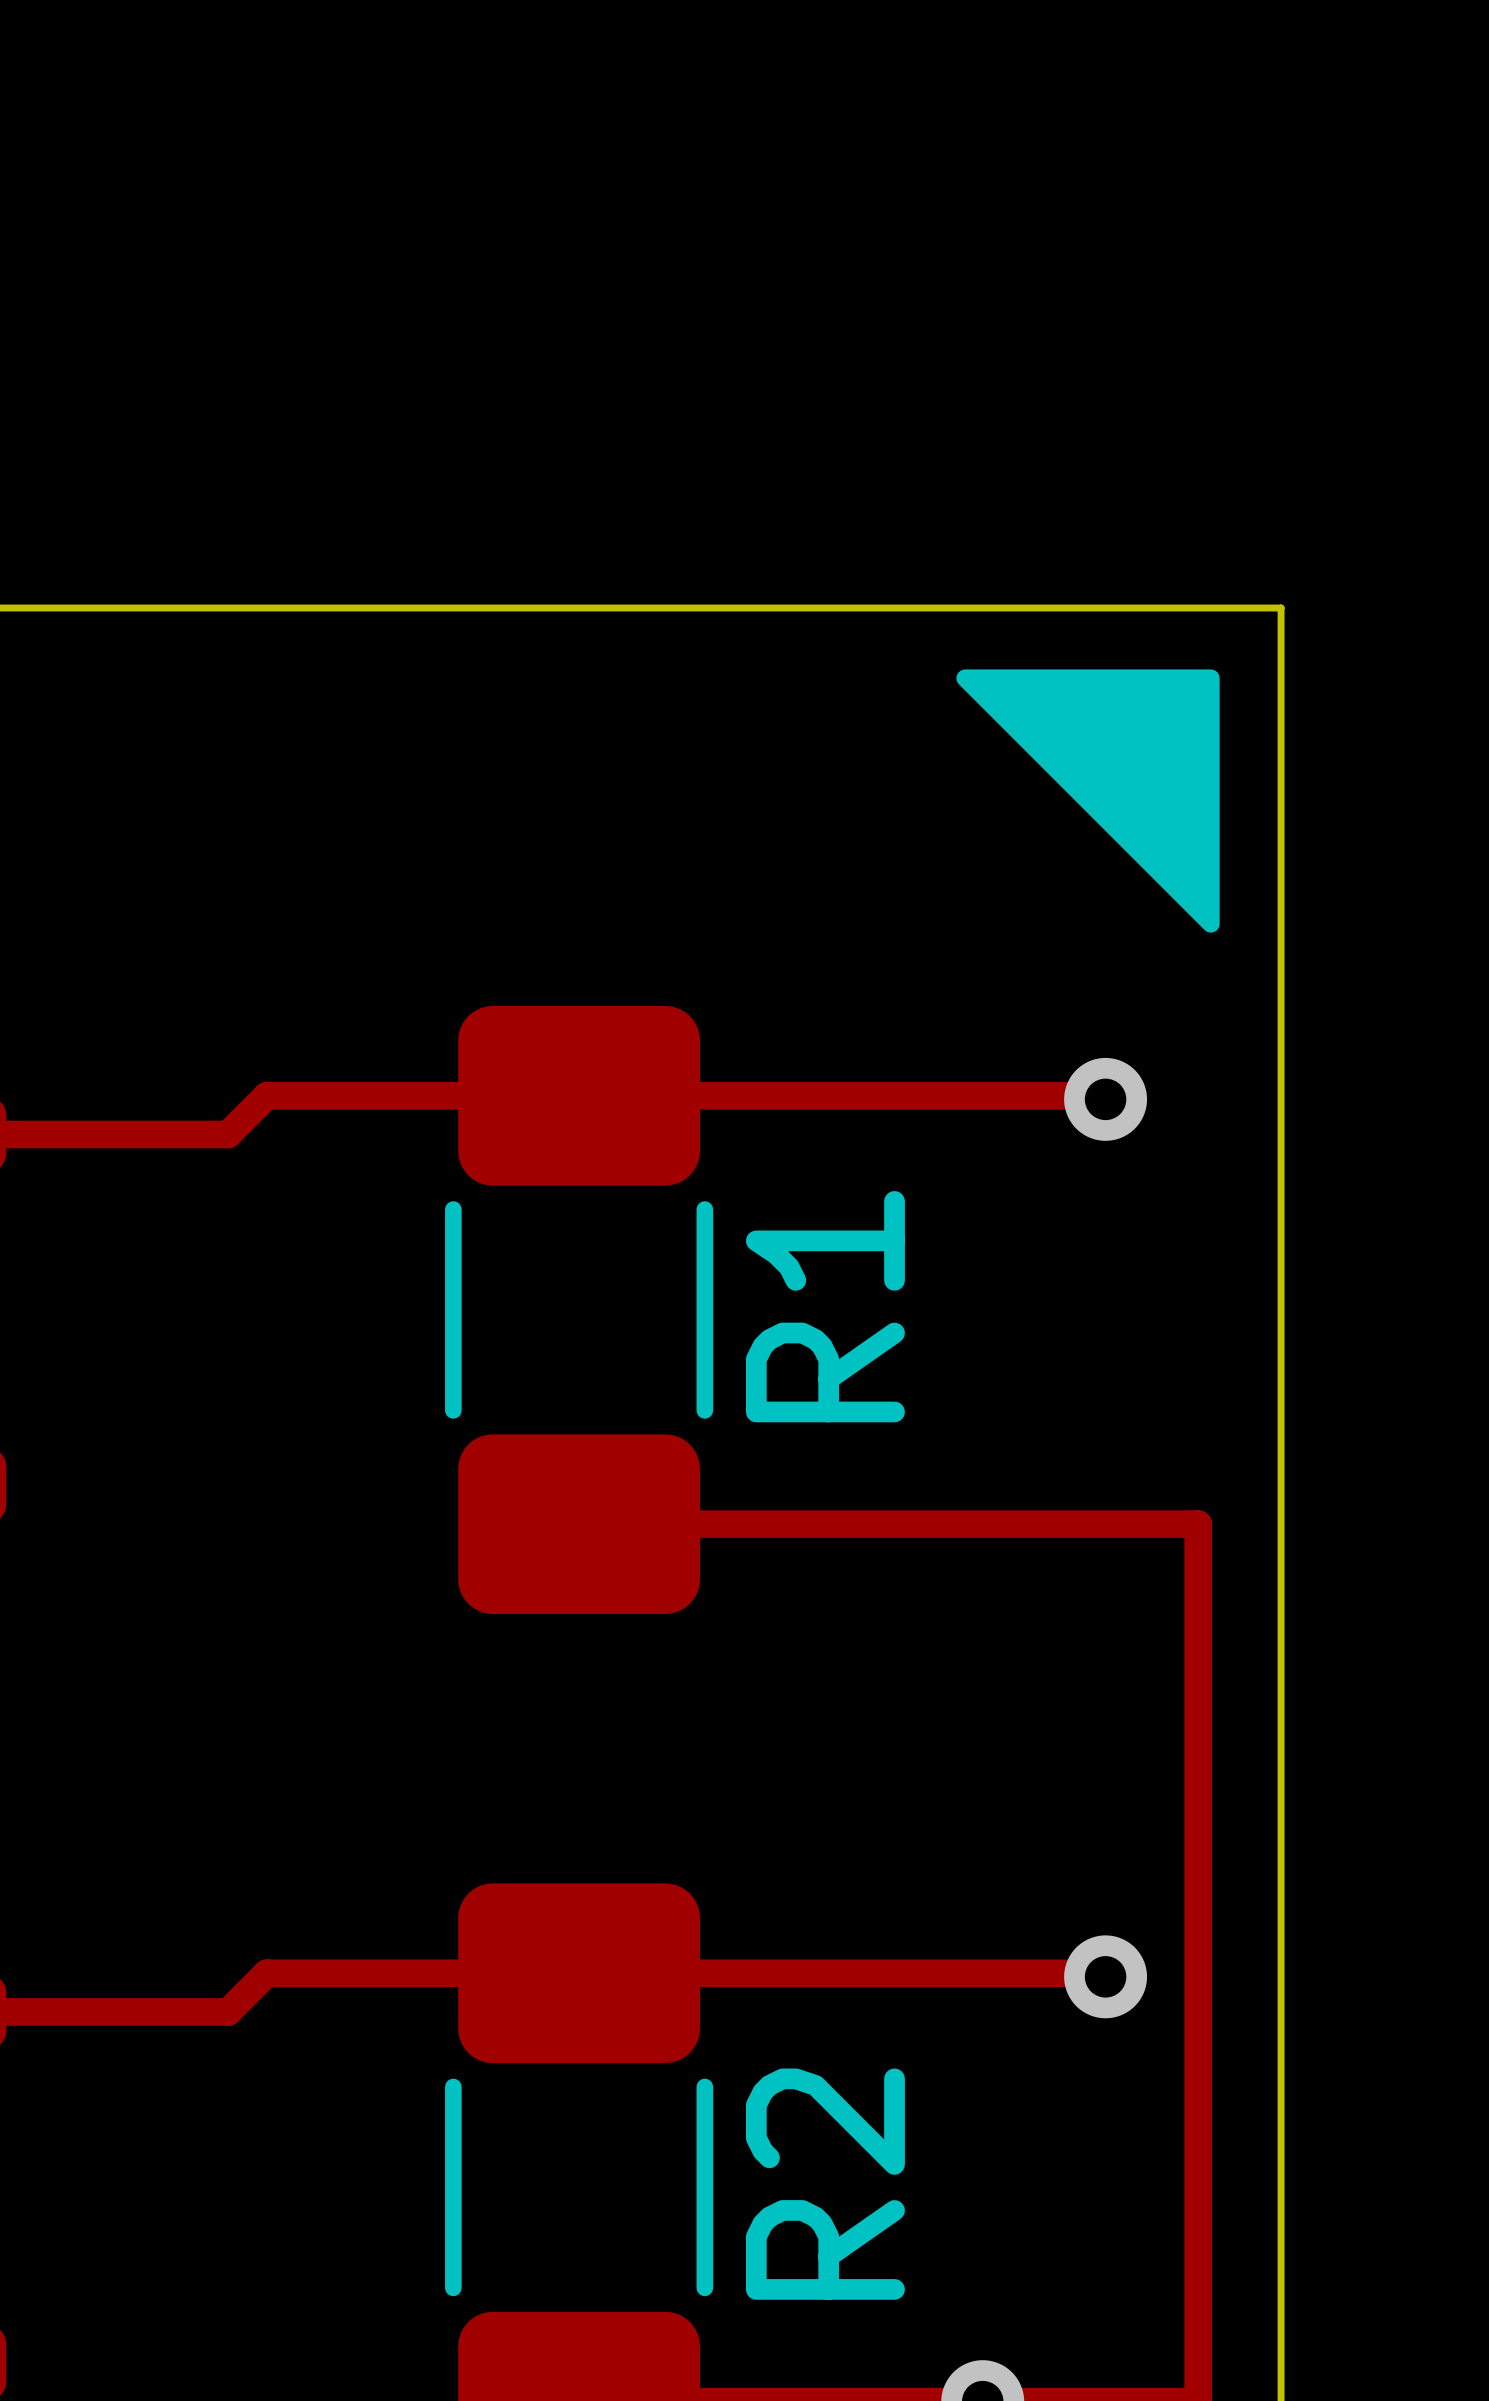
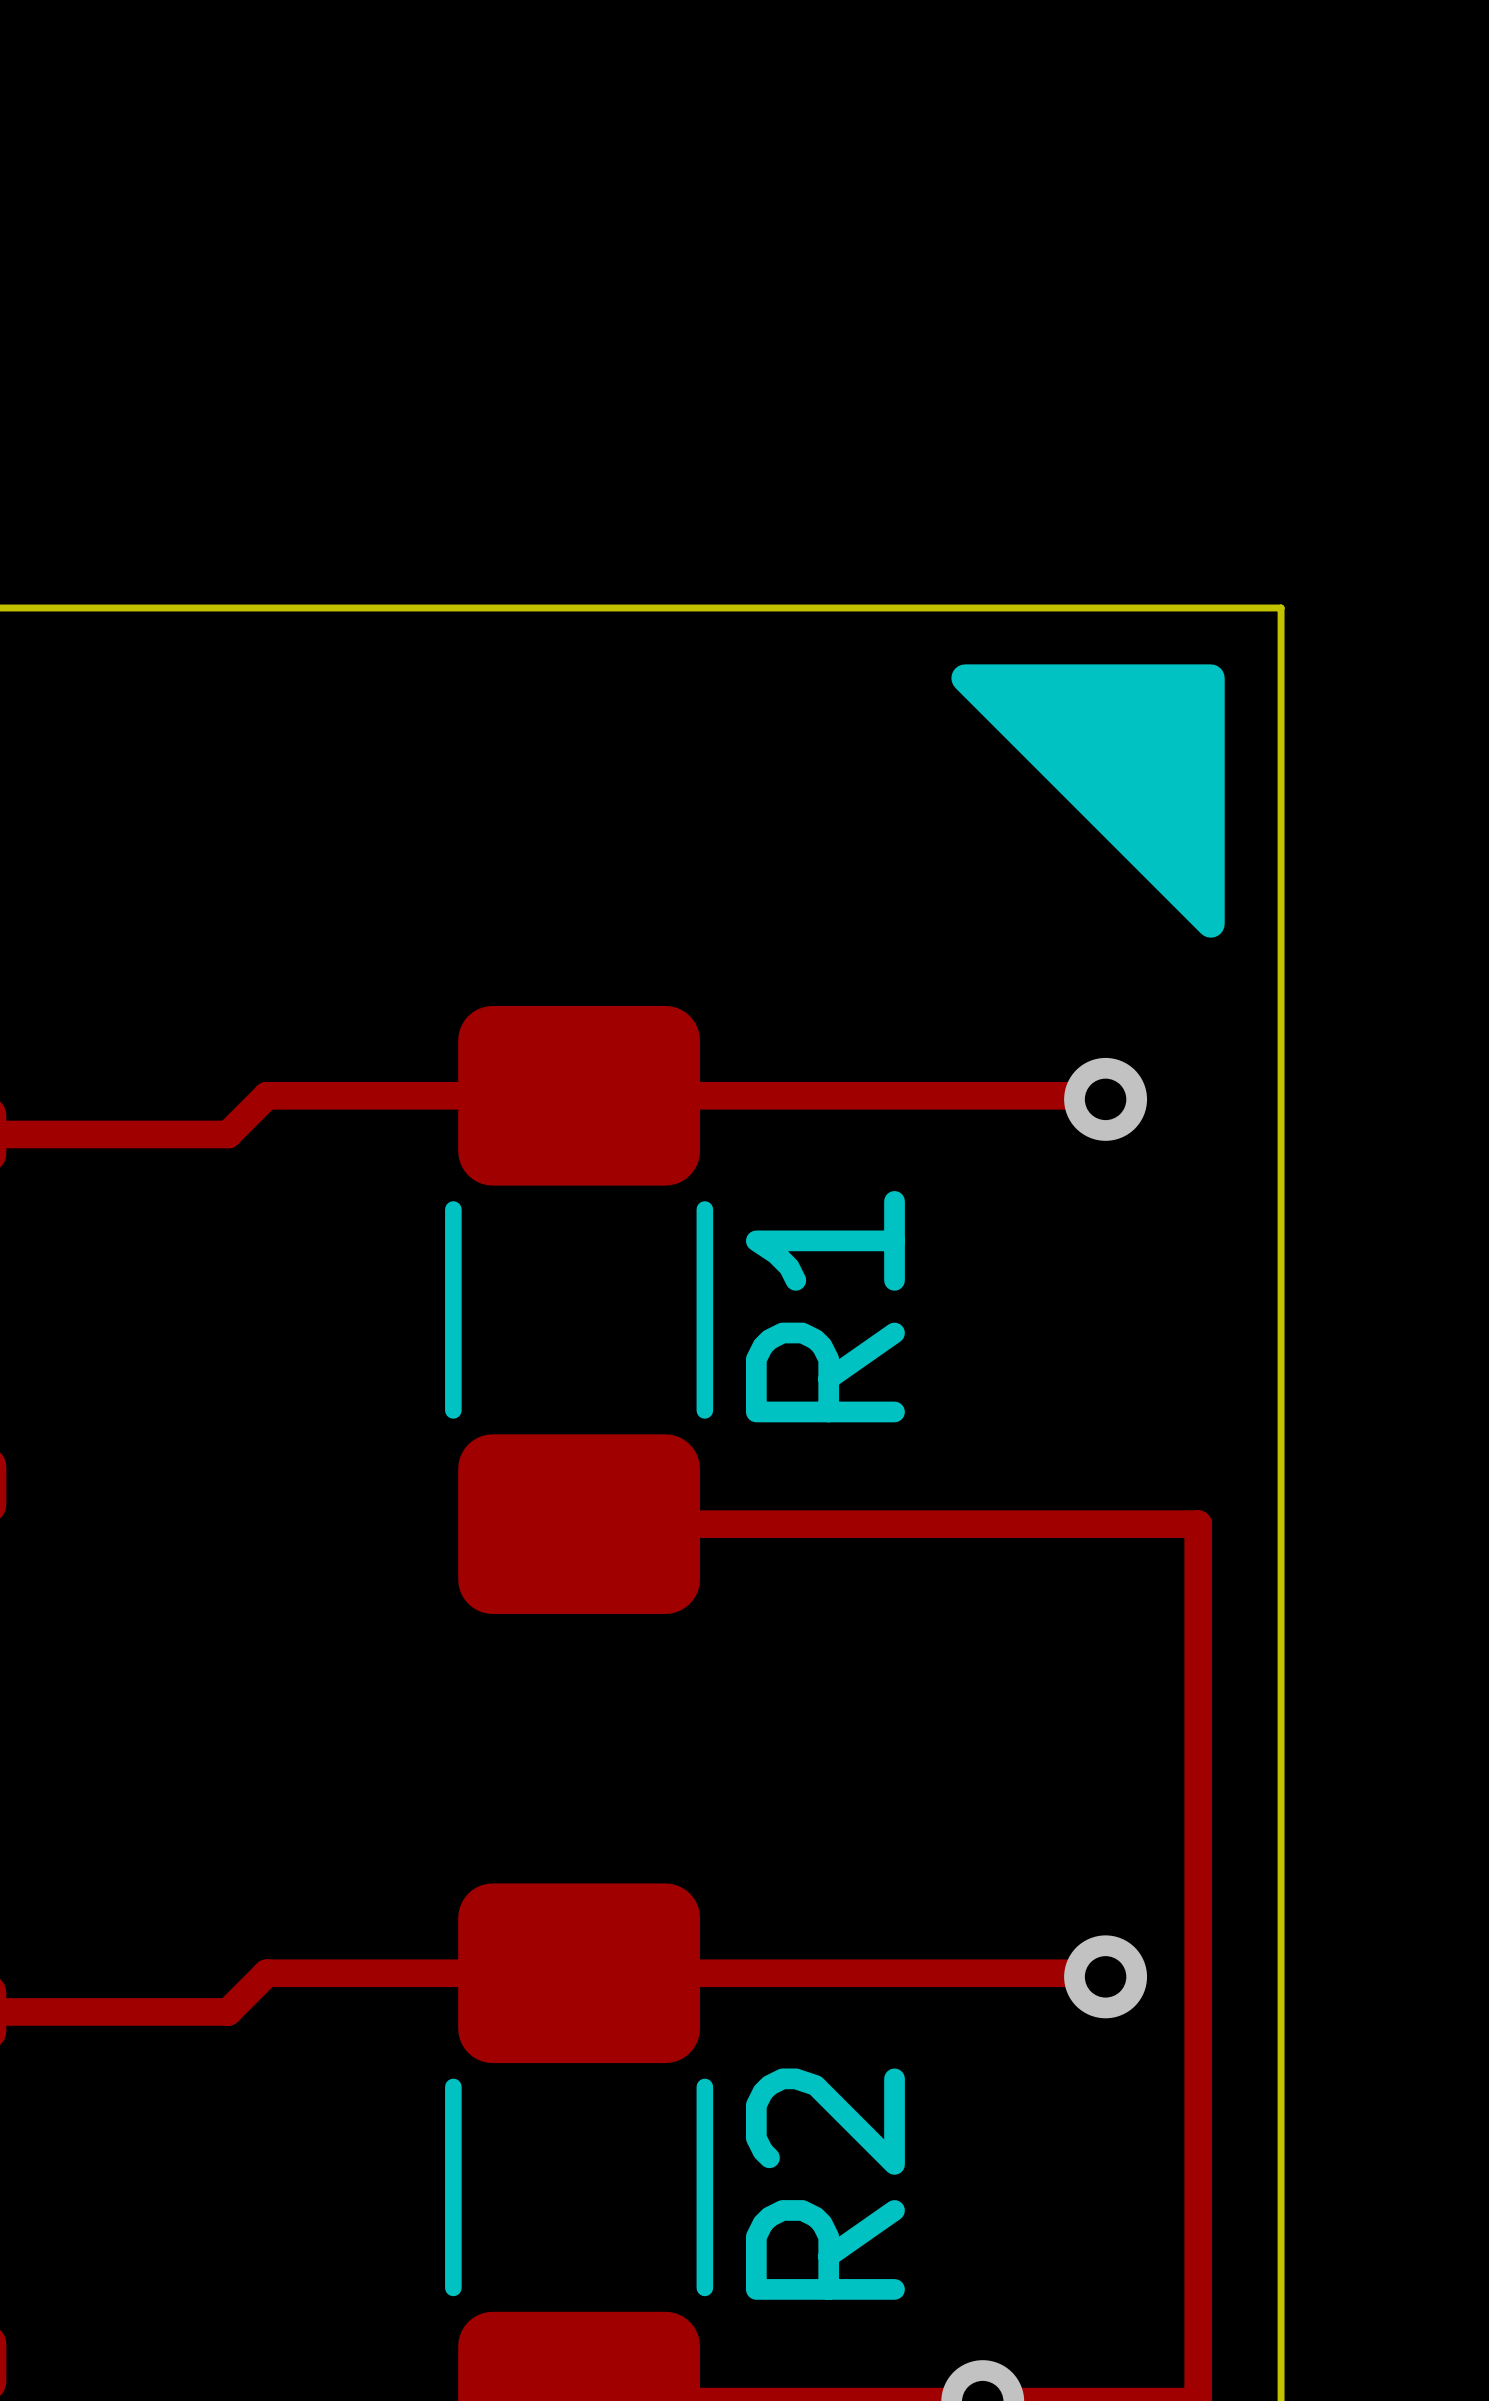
drawing shape: [956, 669, 1220, 933] -> [951, 664, 1225, 938]

